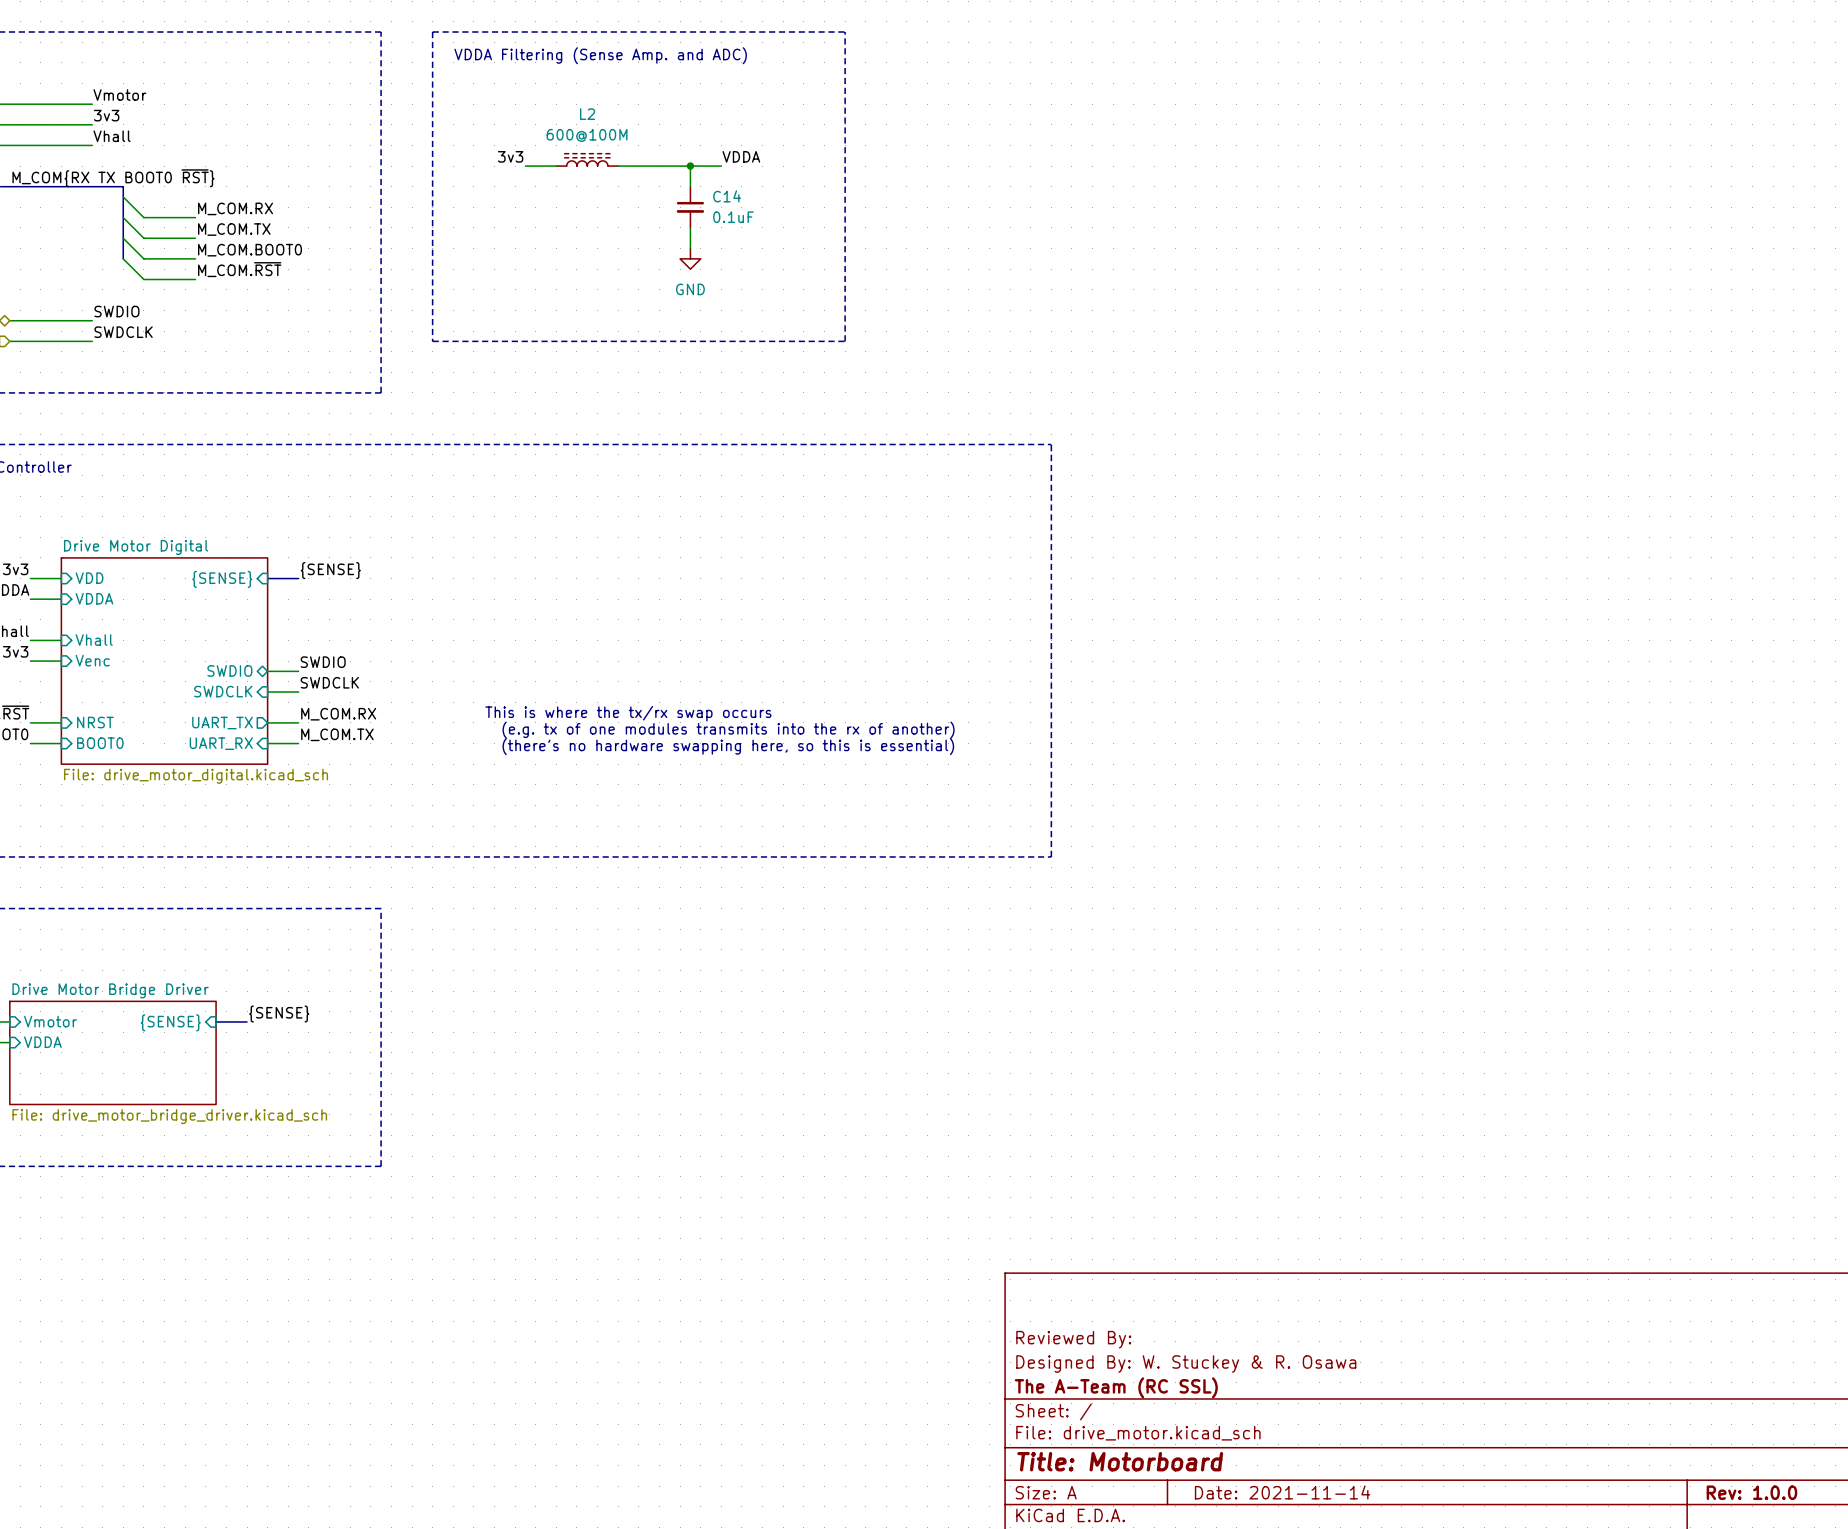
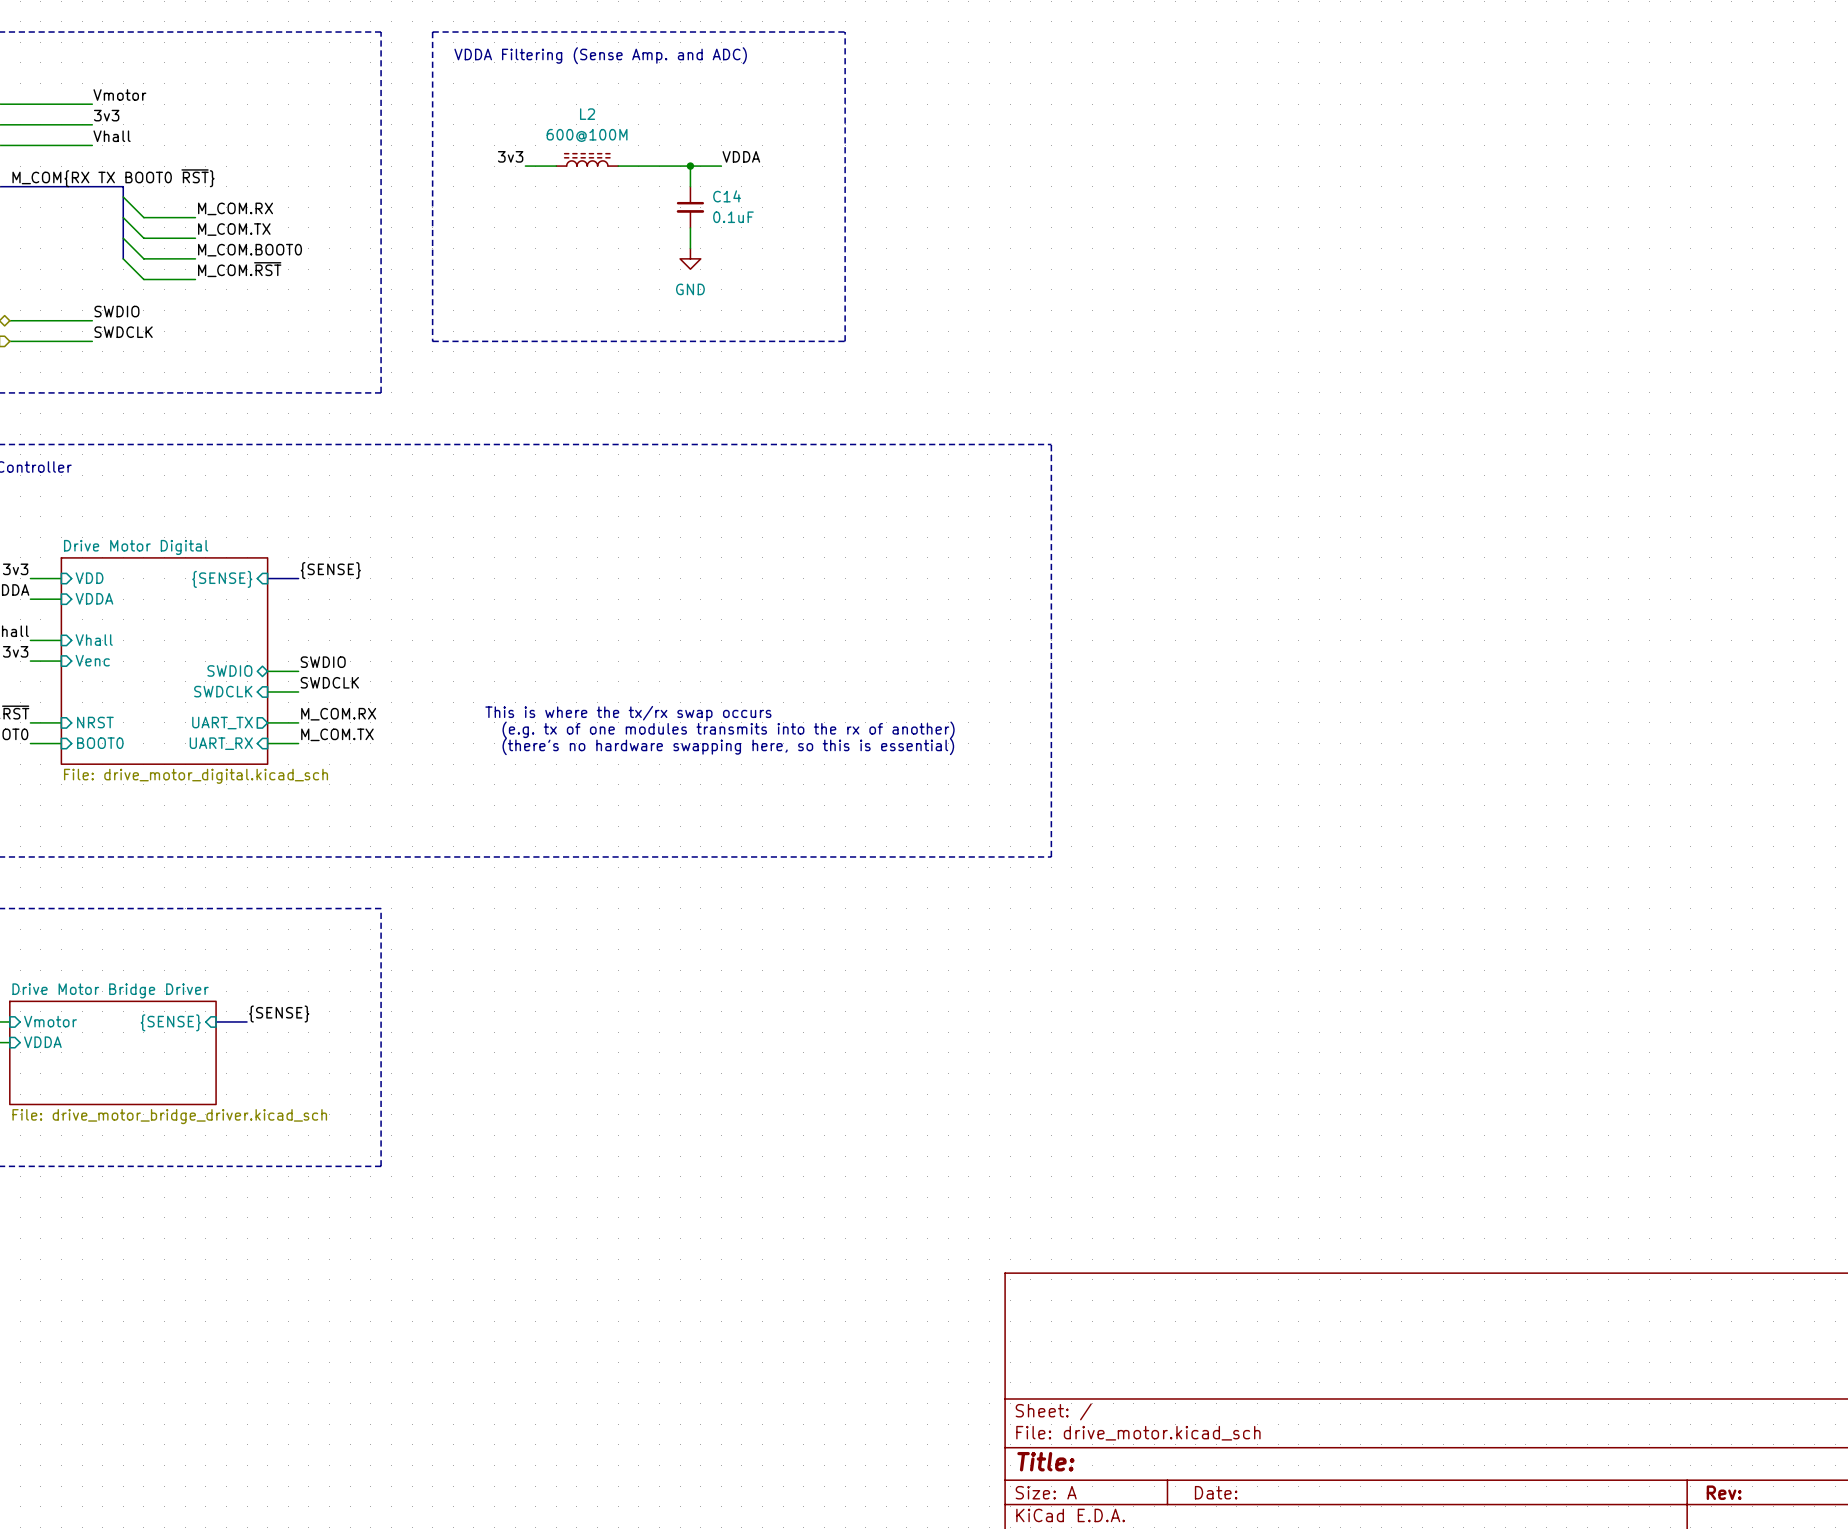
title block: Reviewed By: (1073, 1339) -> none
title block: Designed By: W. Stuckey & R. Osawa (1186, 1364) -> none
title block: The A-Team (RC SSL) (1116, 1387) -> none
title block: Title: Motorboard (1120, 1461) -> Title: (1045, 1461)
title block: Date: 2021-11-14 (1282, 1492) -> Date: (1216, 1492)
title block: Rev: 1.0.0 (1751, 1492) -> Rev: (1724, 1492)

